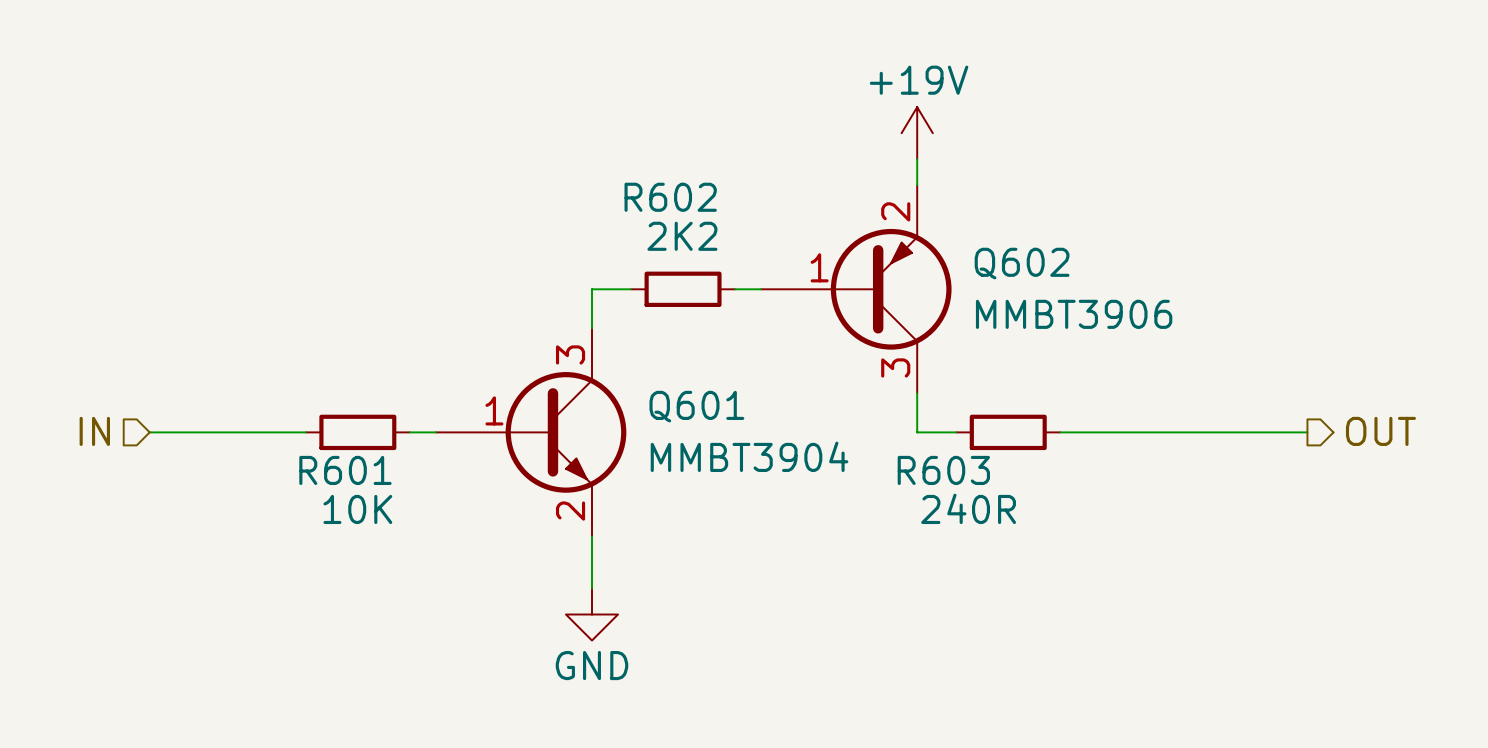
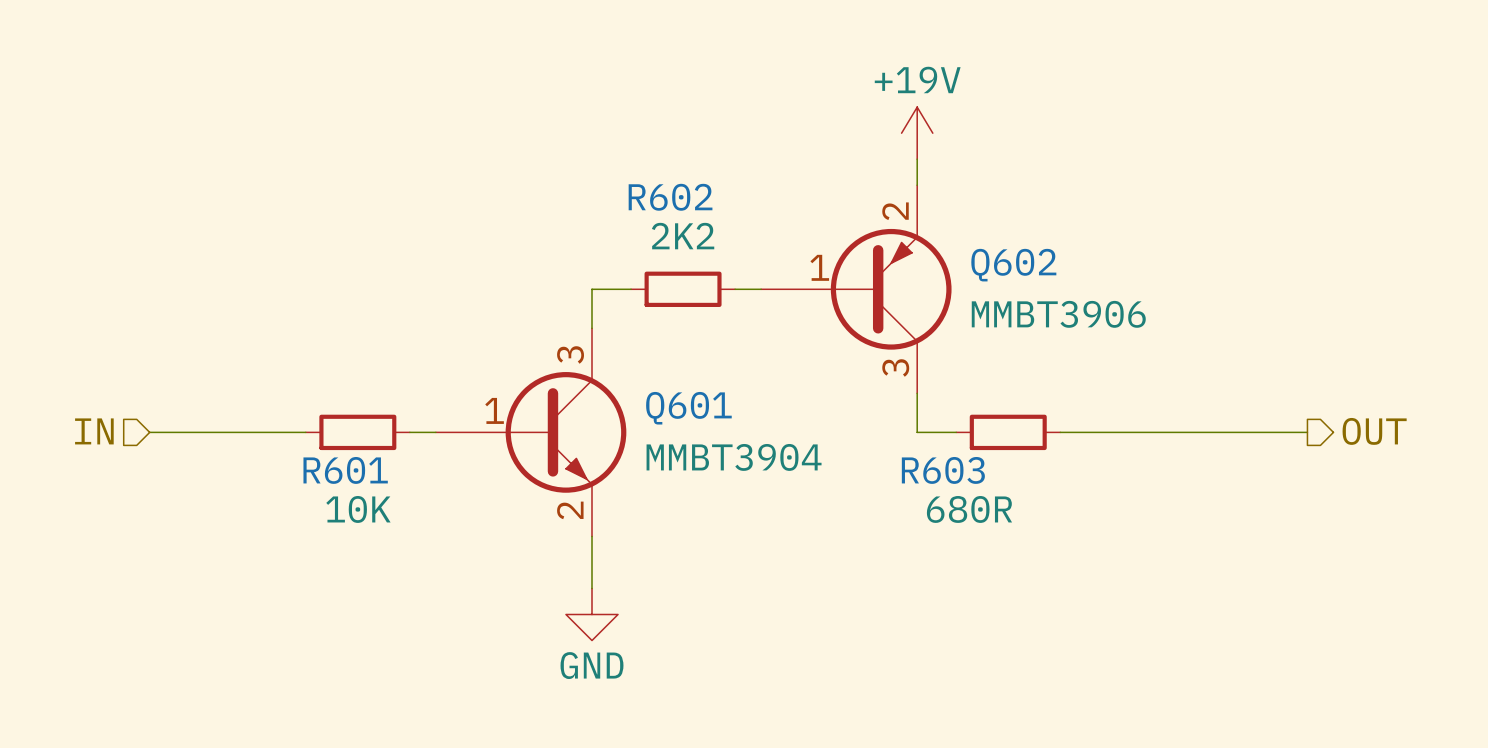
R603 value: 240R (968, 508) -> 680R (969, 509)

